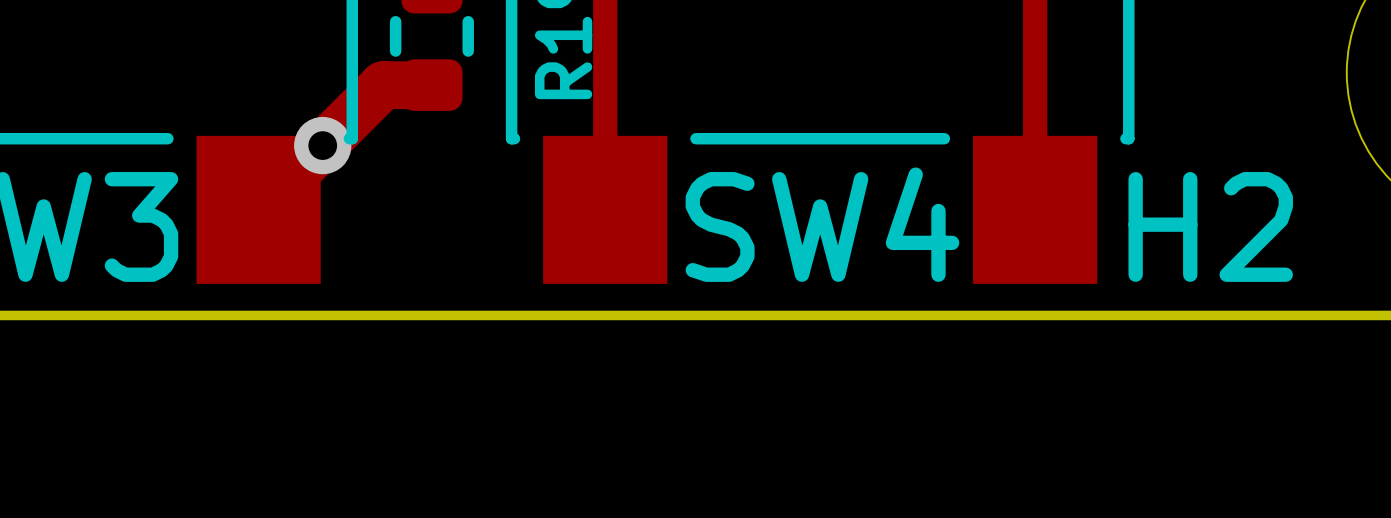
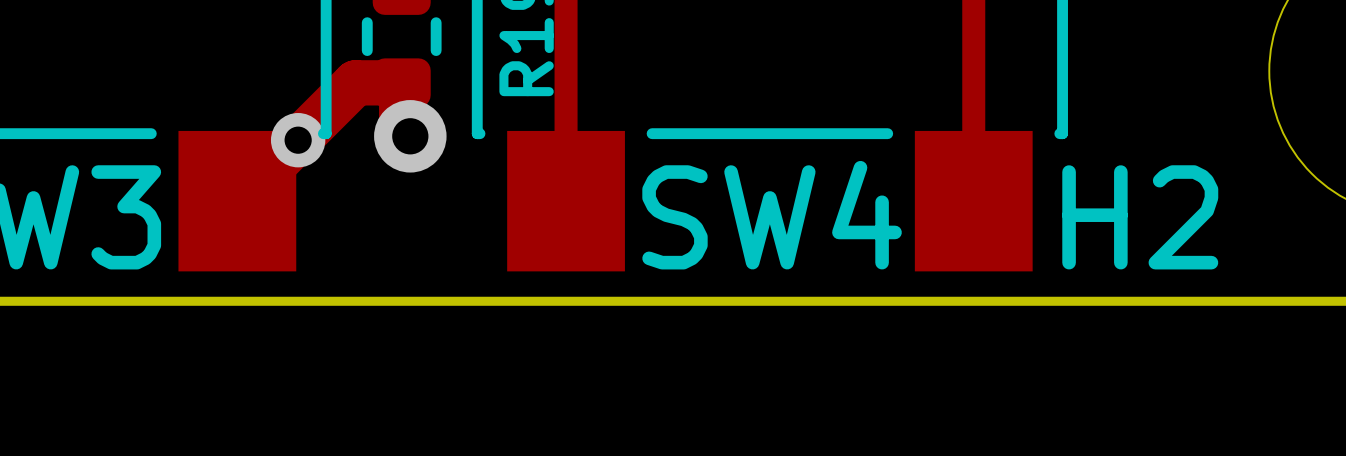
via: none -> (410, 136)

